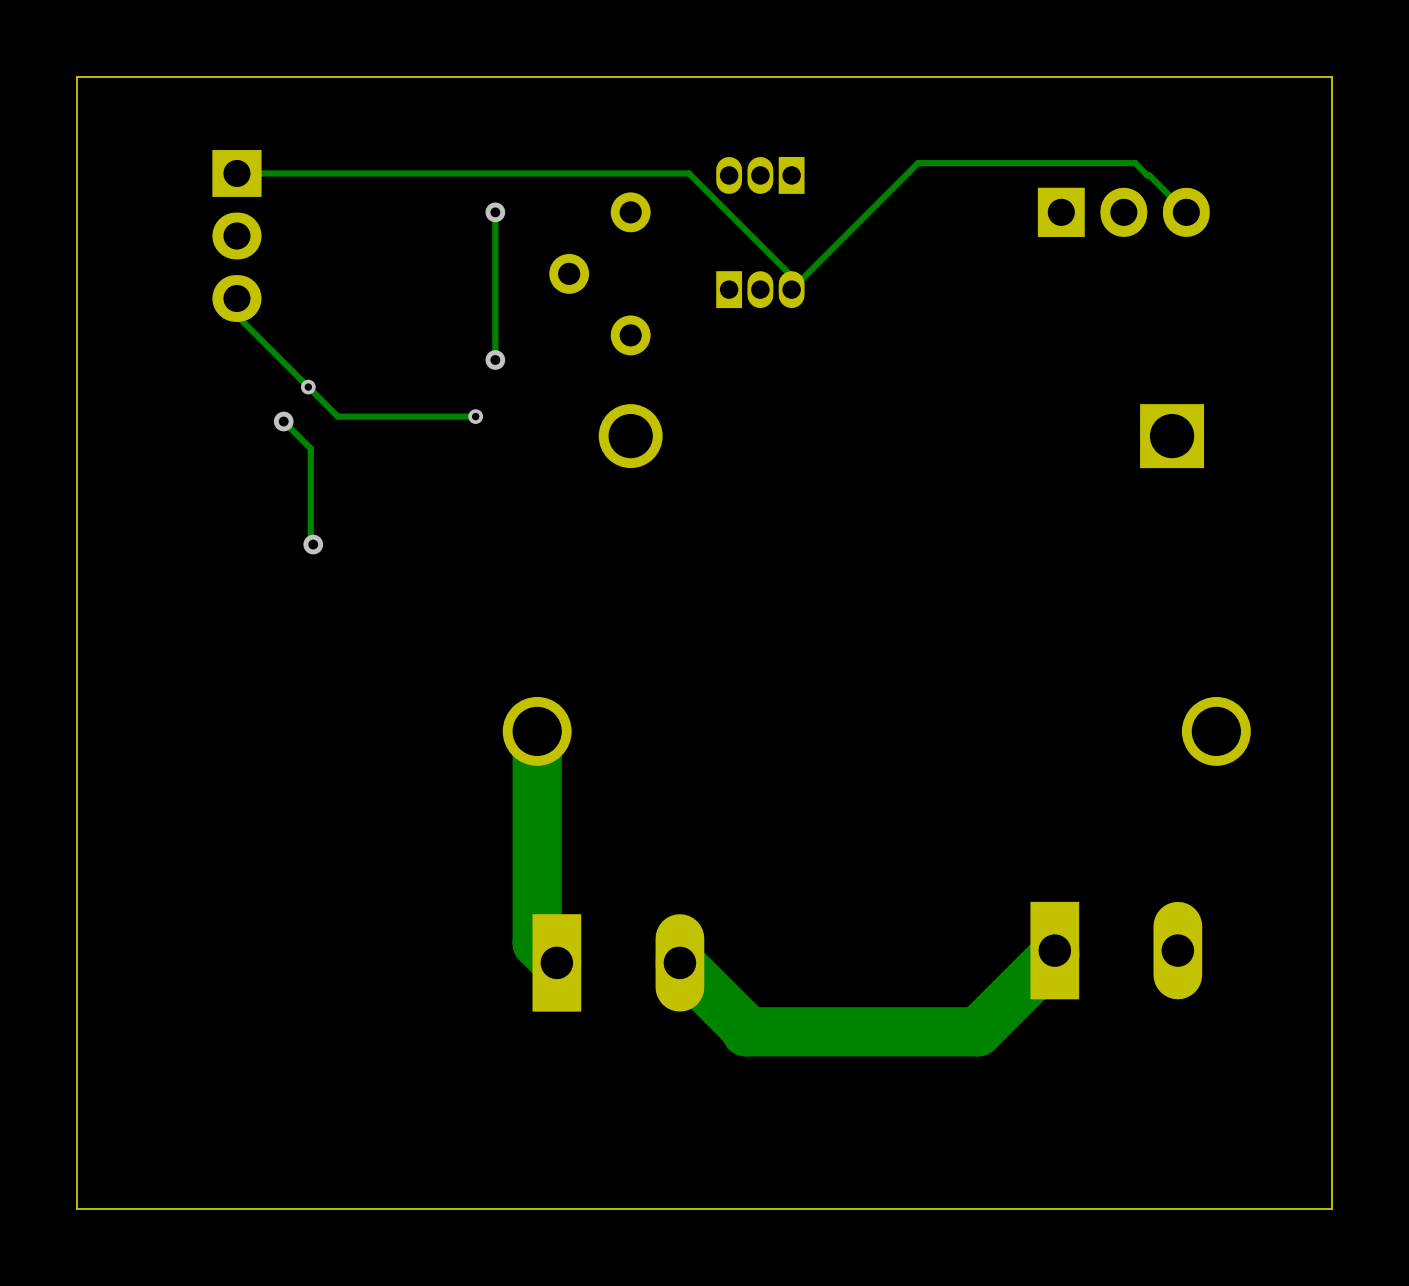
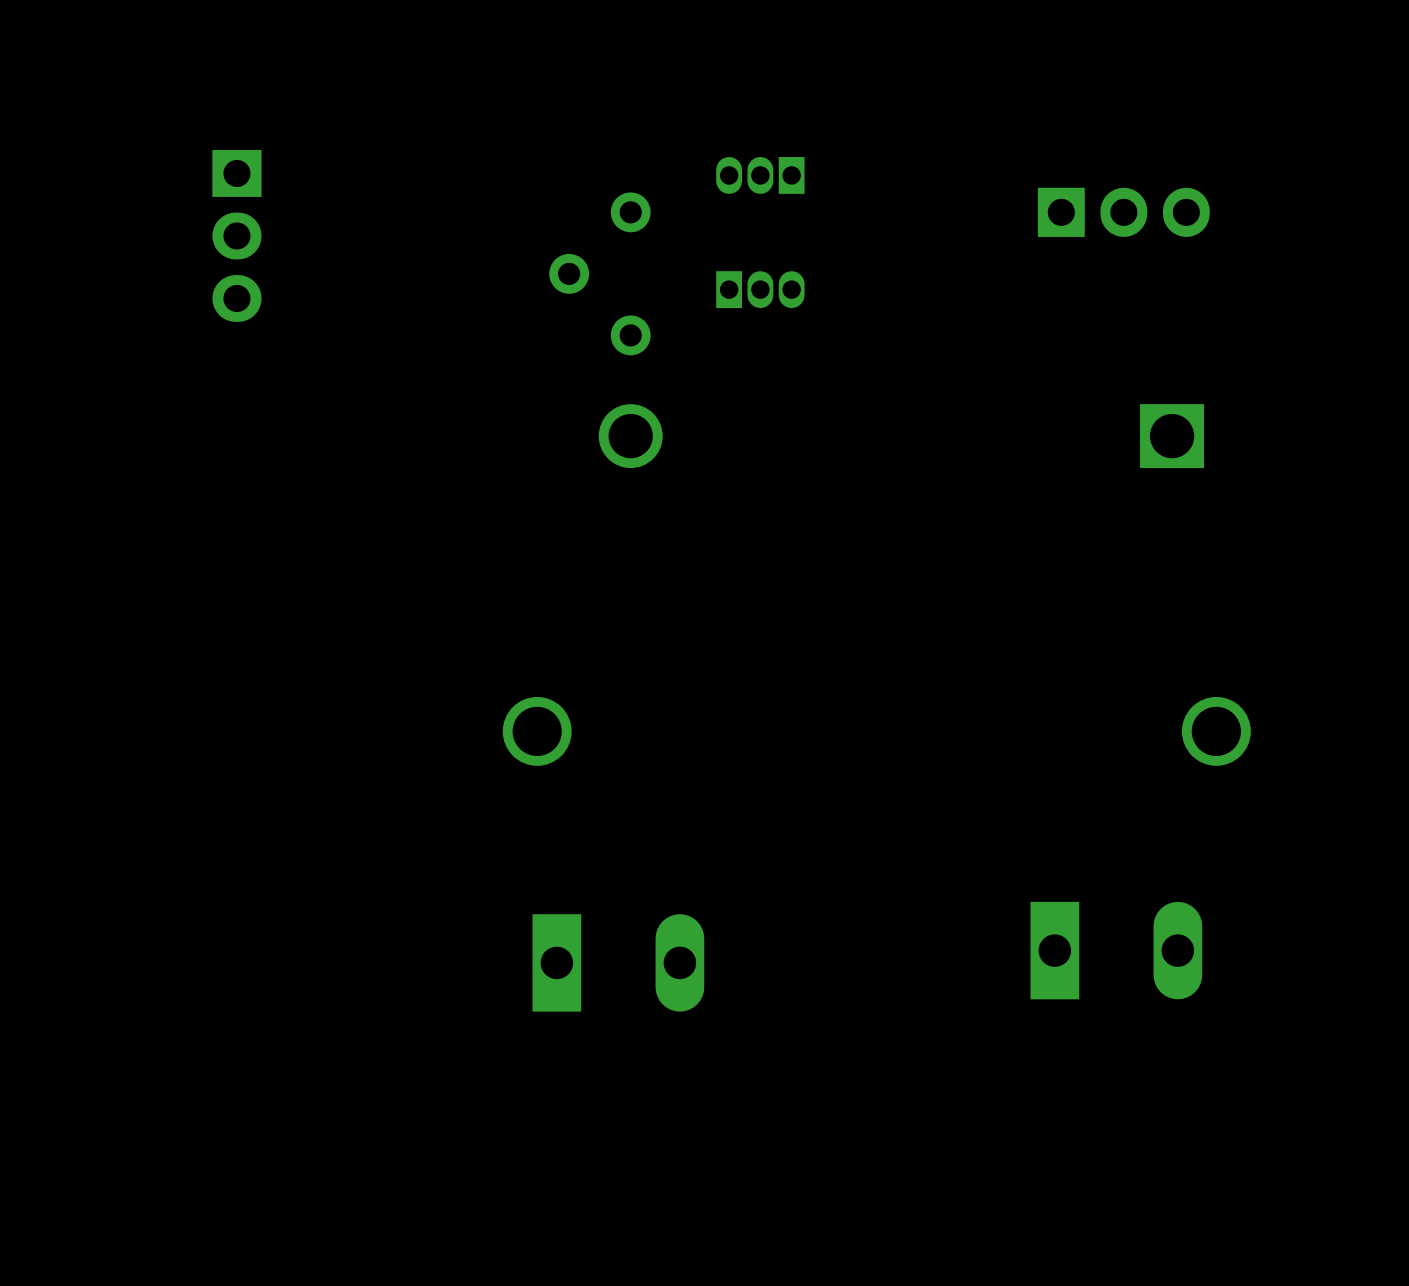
board edge: (1332, 77) (77, 77) (77, 1208) (1332, 1208) (1332, 77) -> none
track: (236, 173) (689, 173) (791, 276) (791, 289) (918, 163) (1135, 163) (1186, 212) -> none
track: (495, 212) (495, 360) -> none
via: (495, 212) -> none
track: (236, 298) (236, 315) (337, 416) (475, 416) -> none
via: (495, 360) -> none
via: (308, 387) -> none
via: (475, 416) -> none
track: (283, 421) (310, 448) (310, 542) (313, 544) -> none
via: (283, 421) -> none
via: (313, 544) -> none
track: (537, 731) (537, 943) (556, 962) -> none
track: (1054, 950) (1054, 954) (977, 1031) (746, 1031) (746, 1029) (679, 962) -> none

